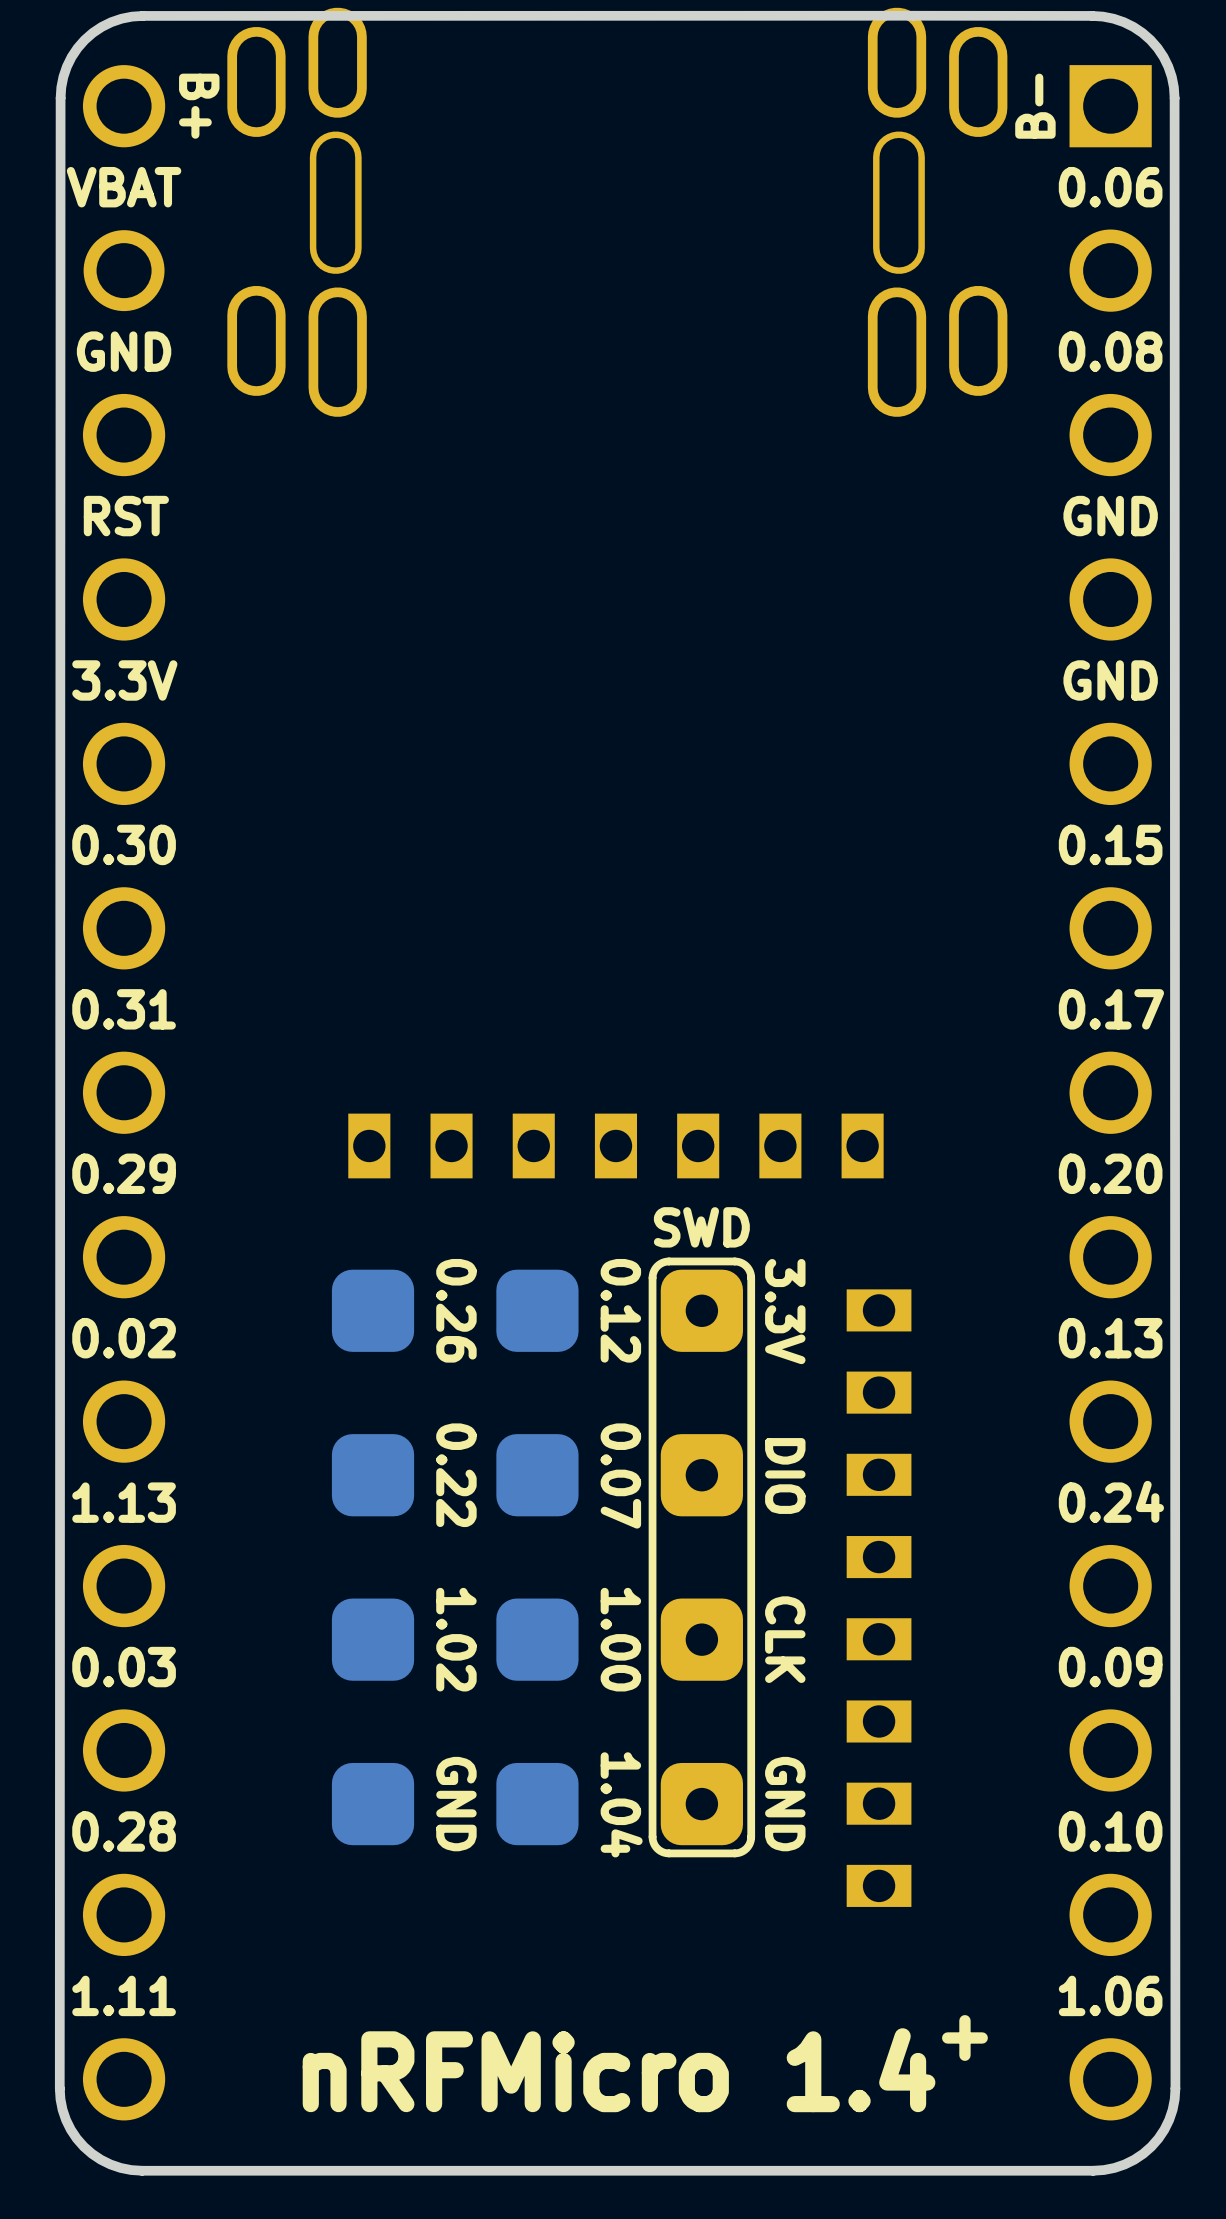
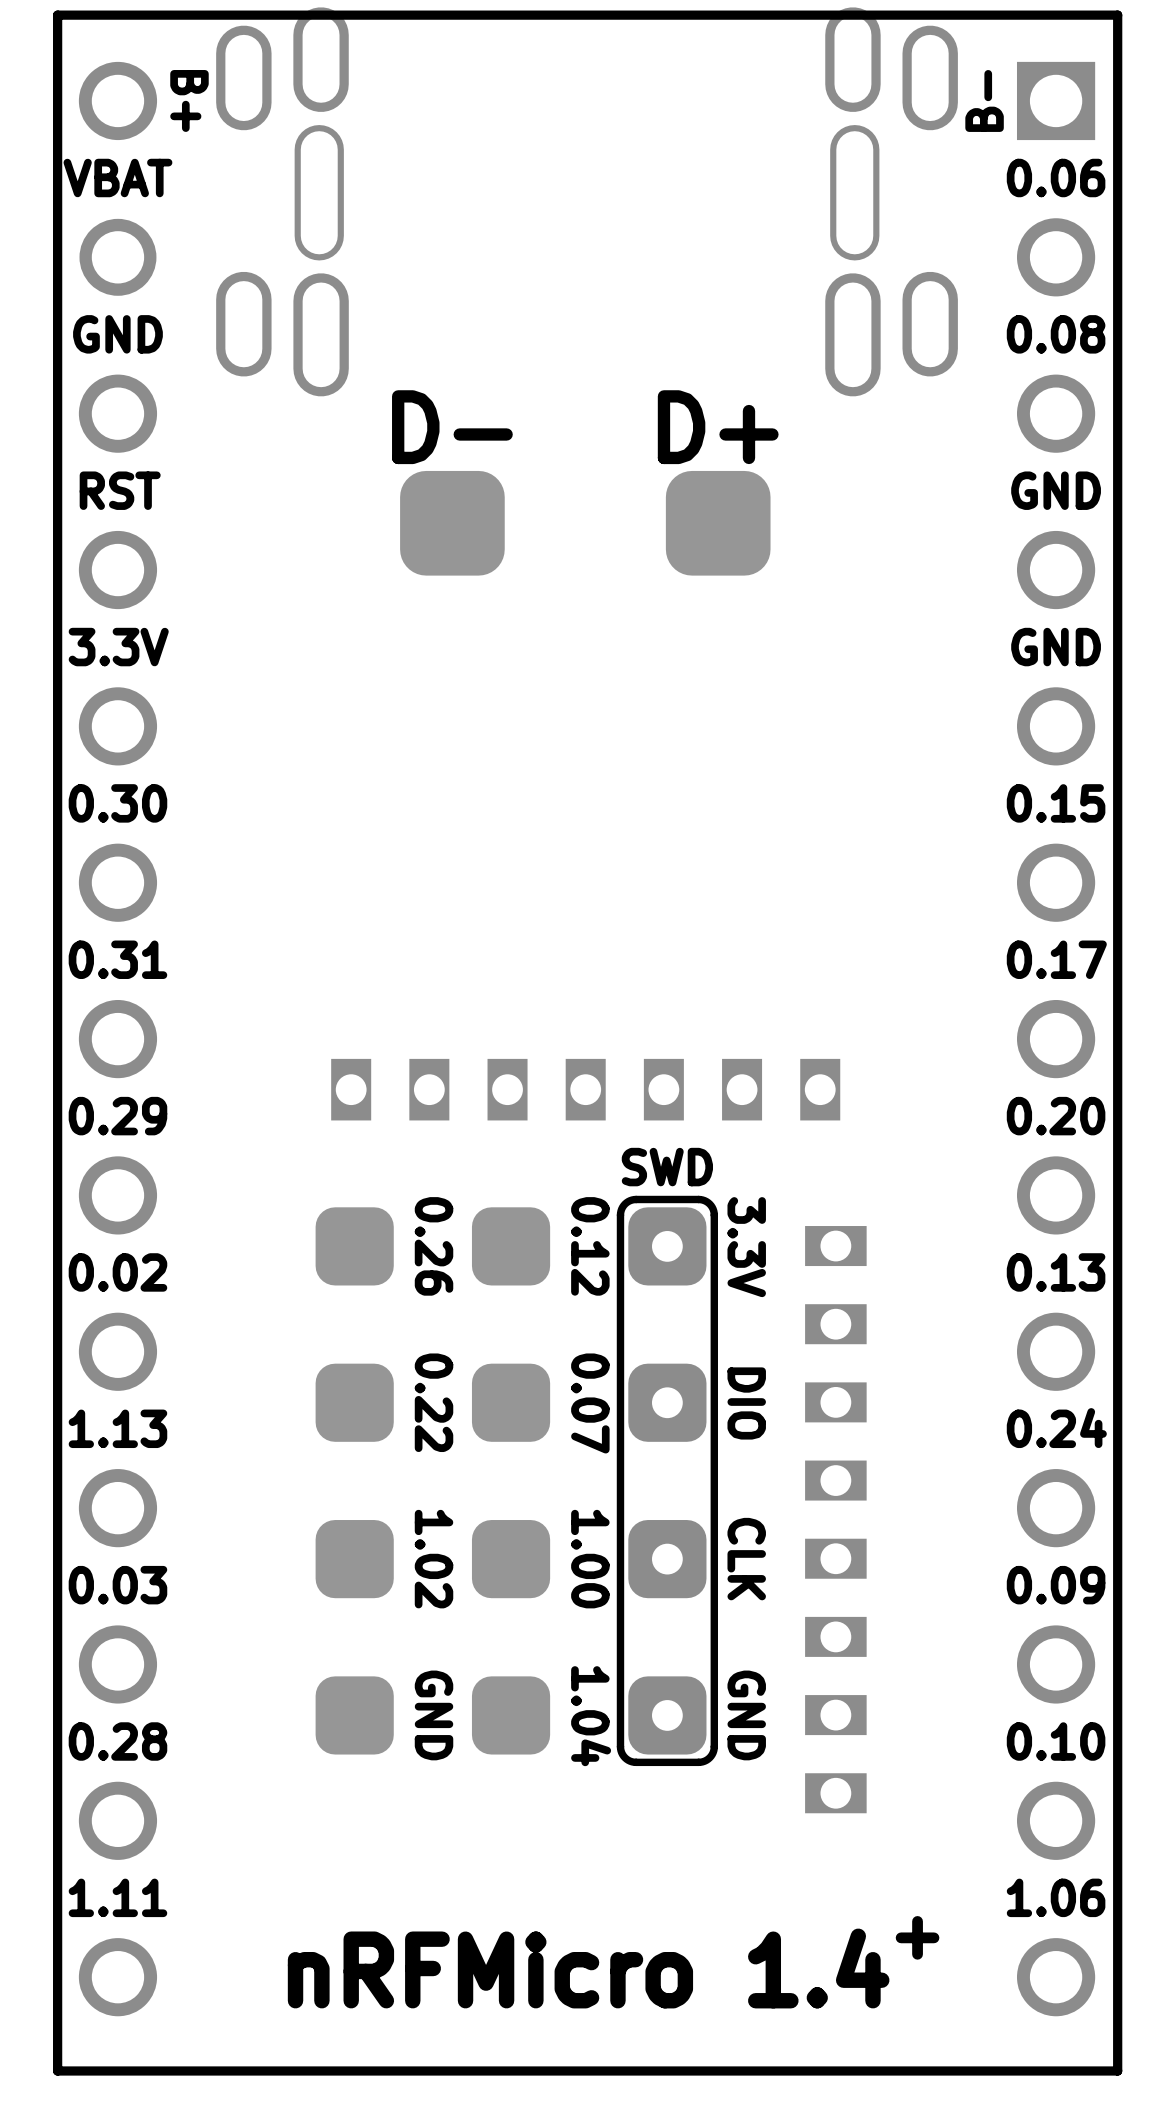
board edge: (913, 15) (142, 15) (111, 22) (92, 32) (77, 48) (66, 66) (60, 98) (59, 2088) (62, 2109) (76, 2138) (91, 2153) (110, 2164) (141, 2170) (1093, 2170) (1114, 2167) (1143, 2153) (1158, 2138) (1169, 2120) (1175, 2088) (1173, 87) (1163, 57) (1150, 40) (1133, 26) (1113, 18) (1092, 15) (913, 15) -> (1117, 15) (1117, 2070) (57, 2070) (57, 15) (1117, 15)
part: none -> (452, 523)
part: none -> (718, 523)

